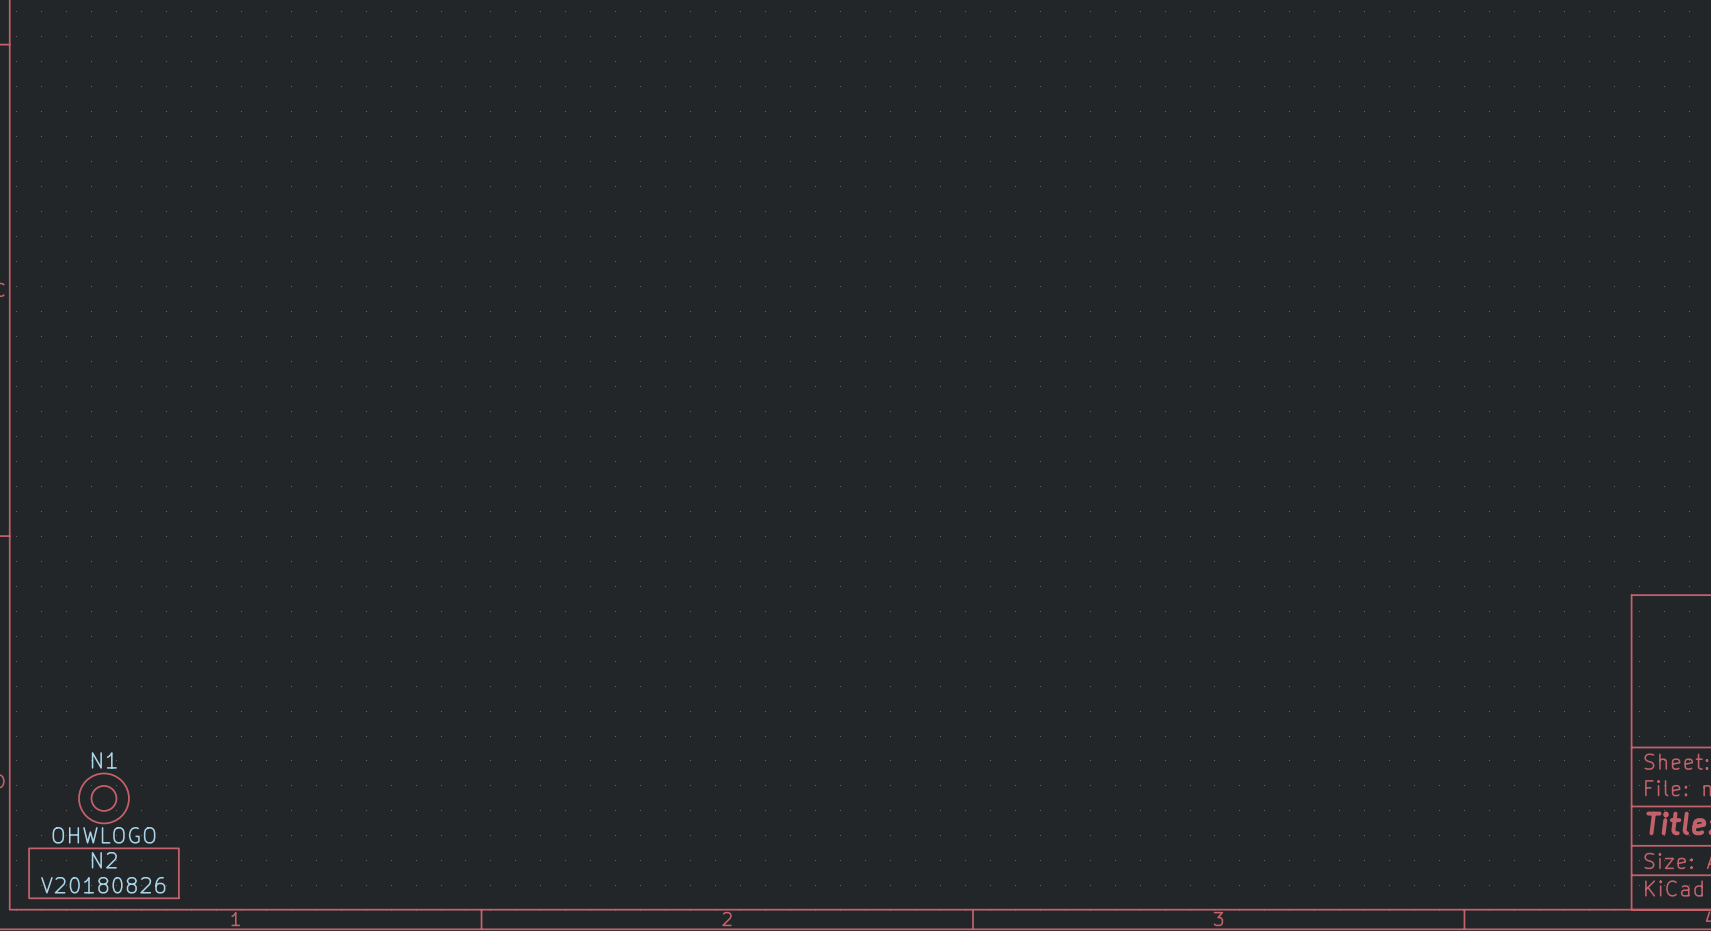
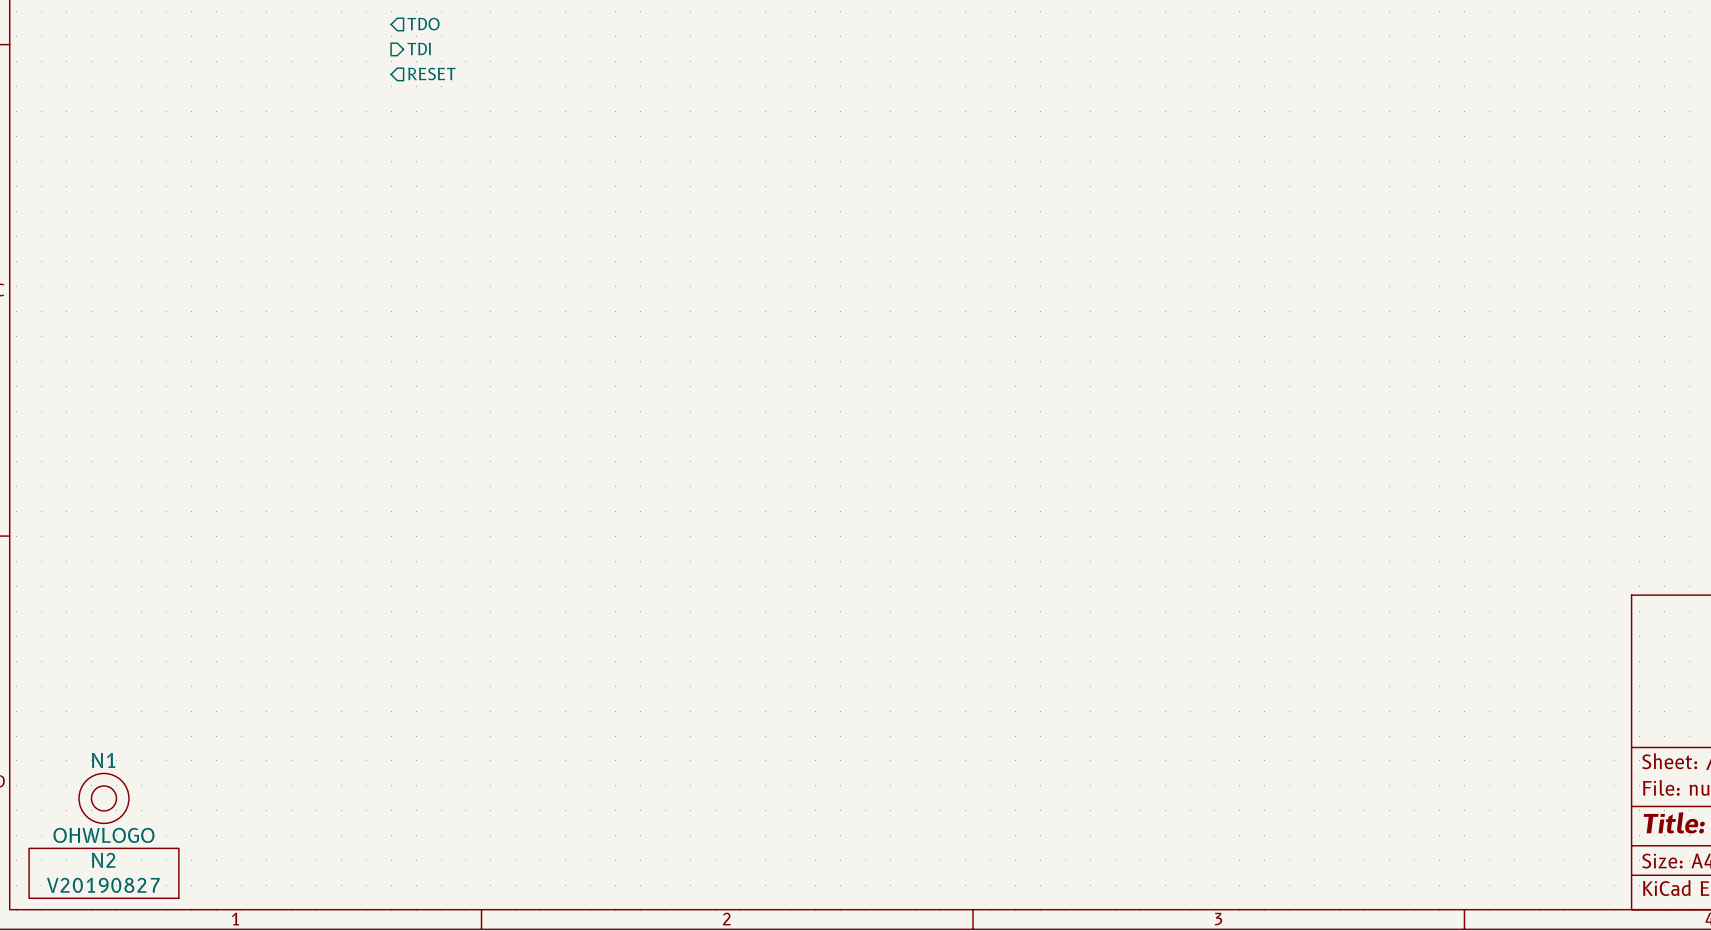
sheet pin: none -> TDO (423, 24)
sheet pin: none -> TDI (419, 48)
sheet pin: none -> RESET (431, 74)
N2 value: V20180826 (103, 885) -> V20190827 (103, 885)

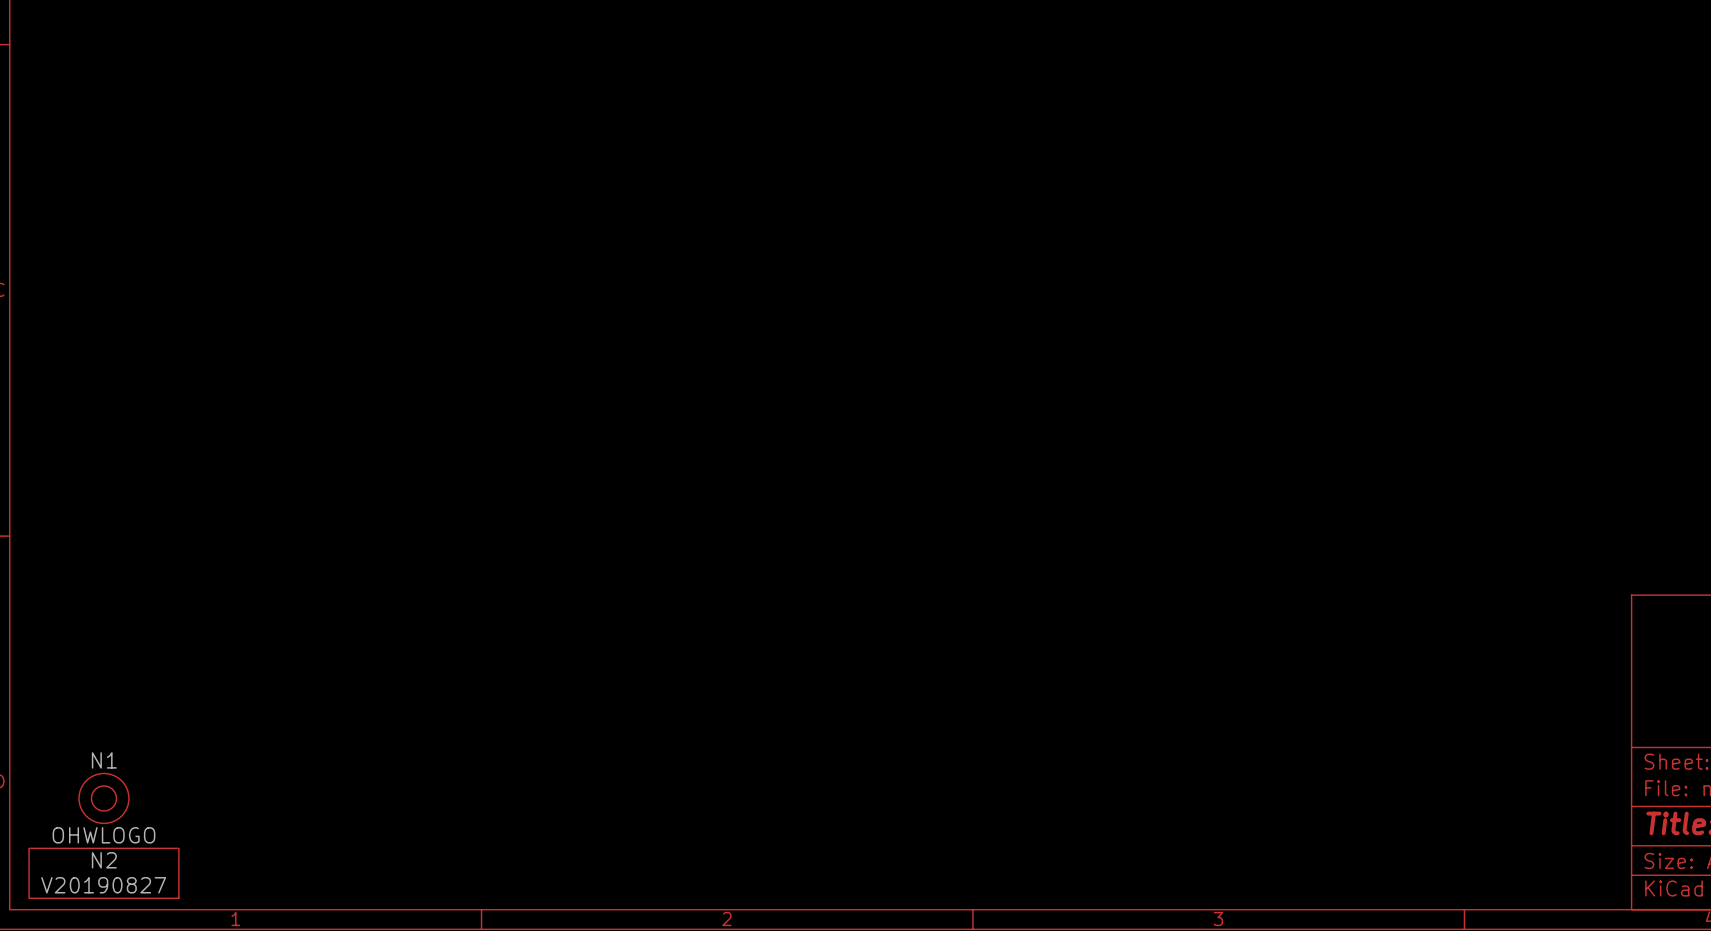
sheet pin: TDO (423, 24) -> none
sheet pin: TDI (419, 48) -> none
sheet pin: RESET (431, 74) -> none

